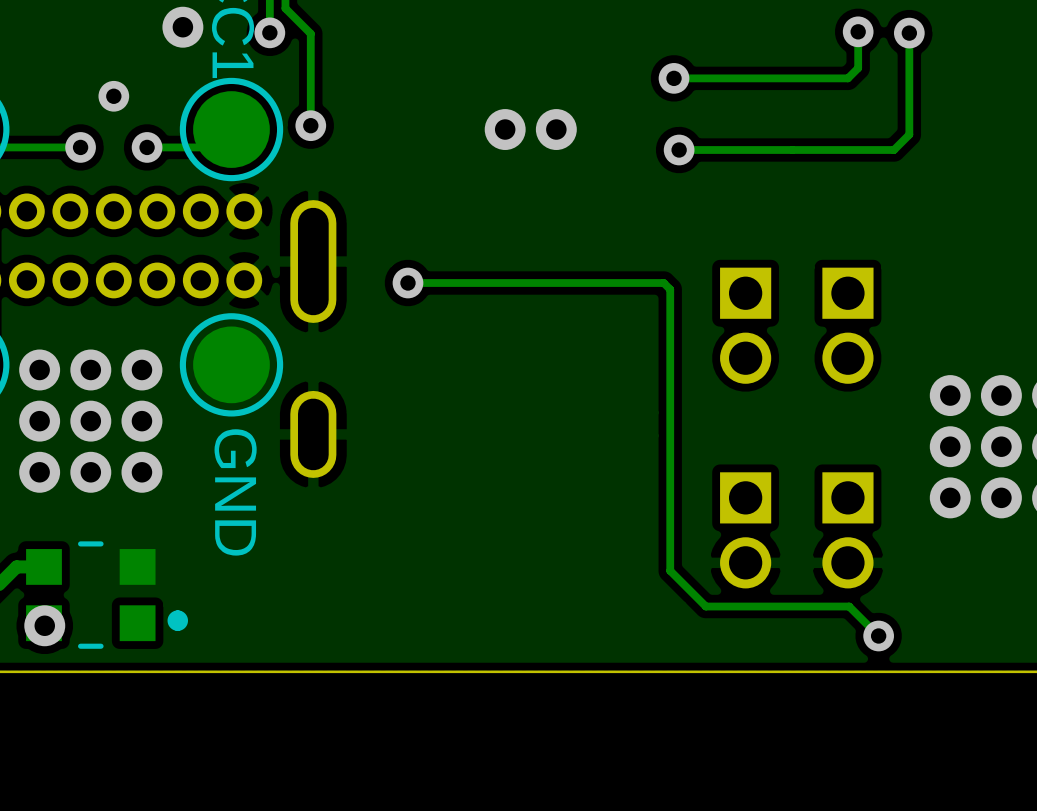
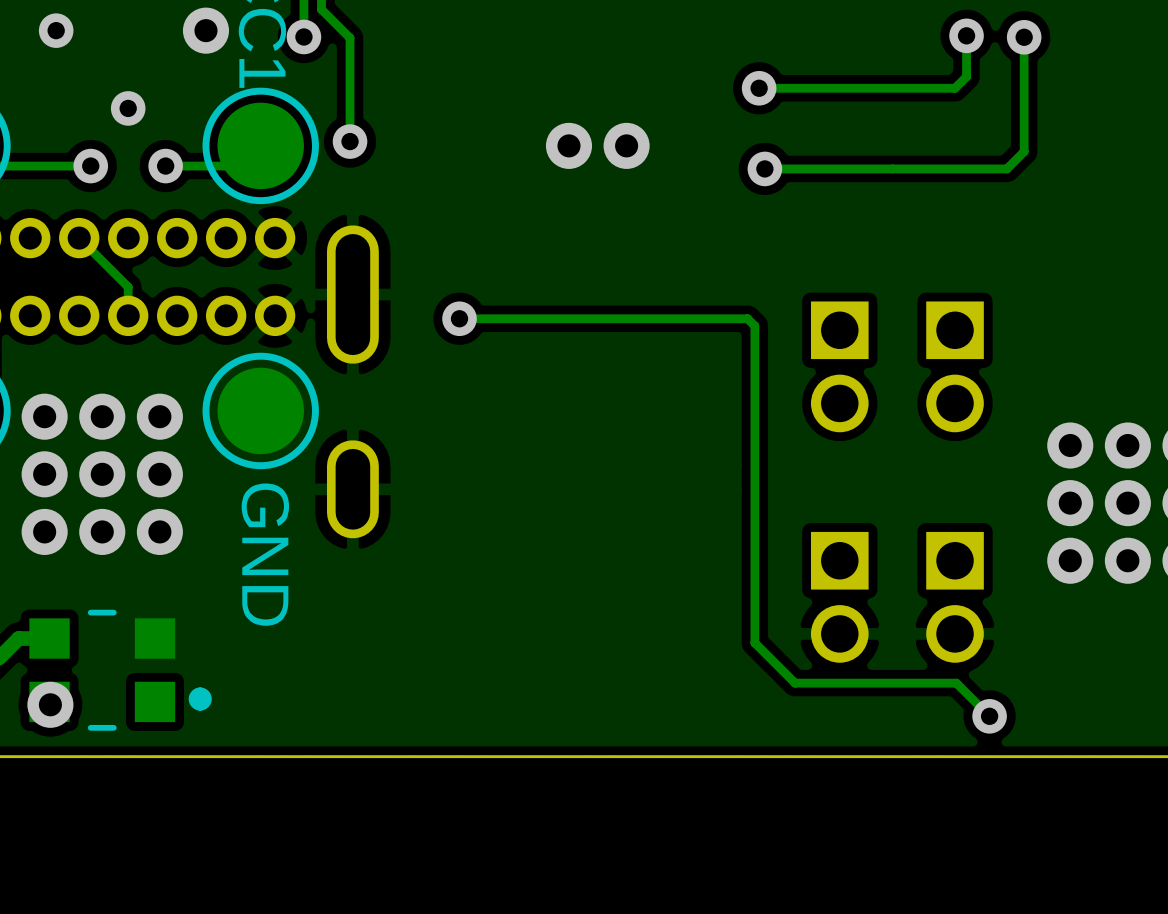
via: none -> (56, 30)
track: none -> (79, 238) (128, 287) (128, 315)

